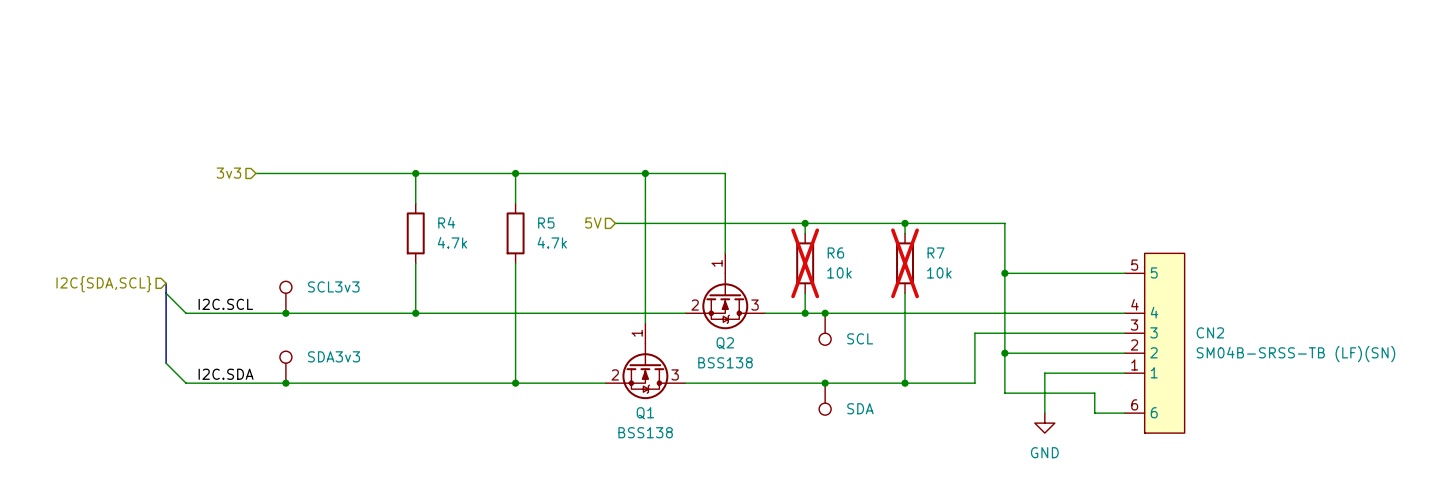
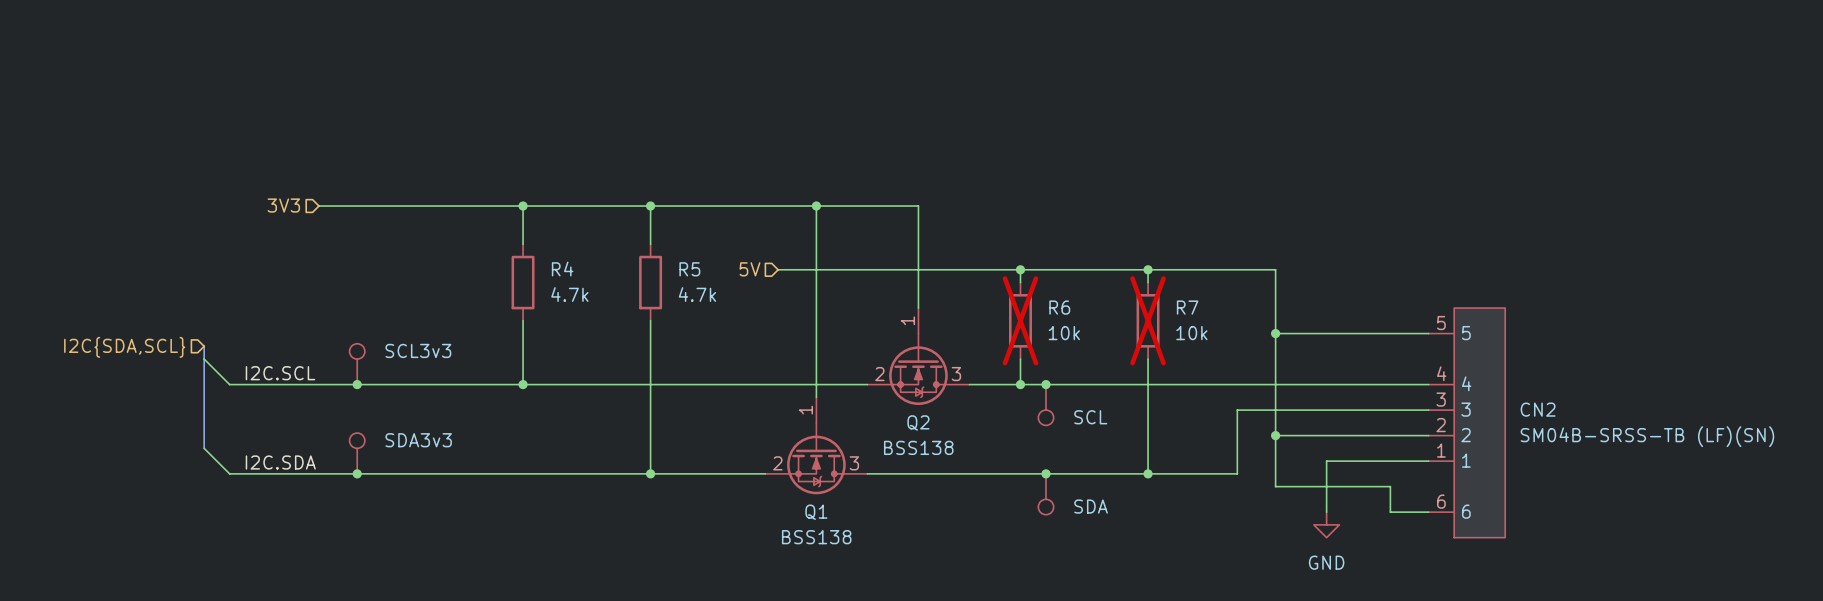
hierarchical label: 3v3 (228, 173) -> 3V3 (283, 205)

